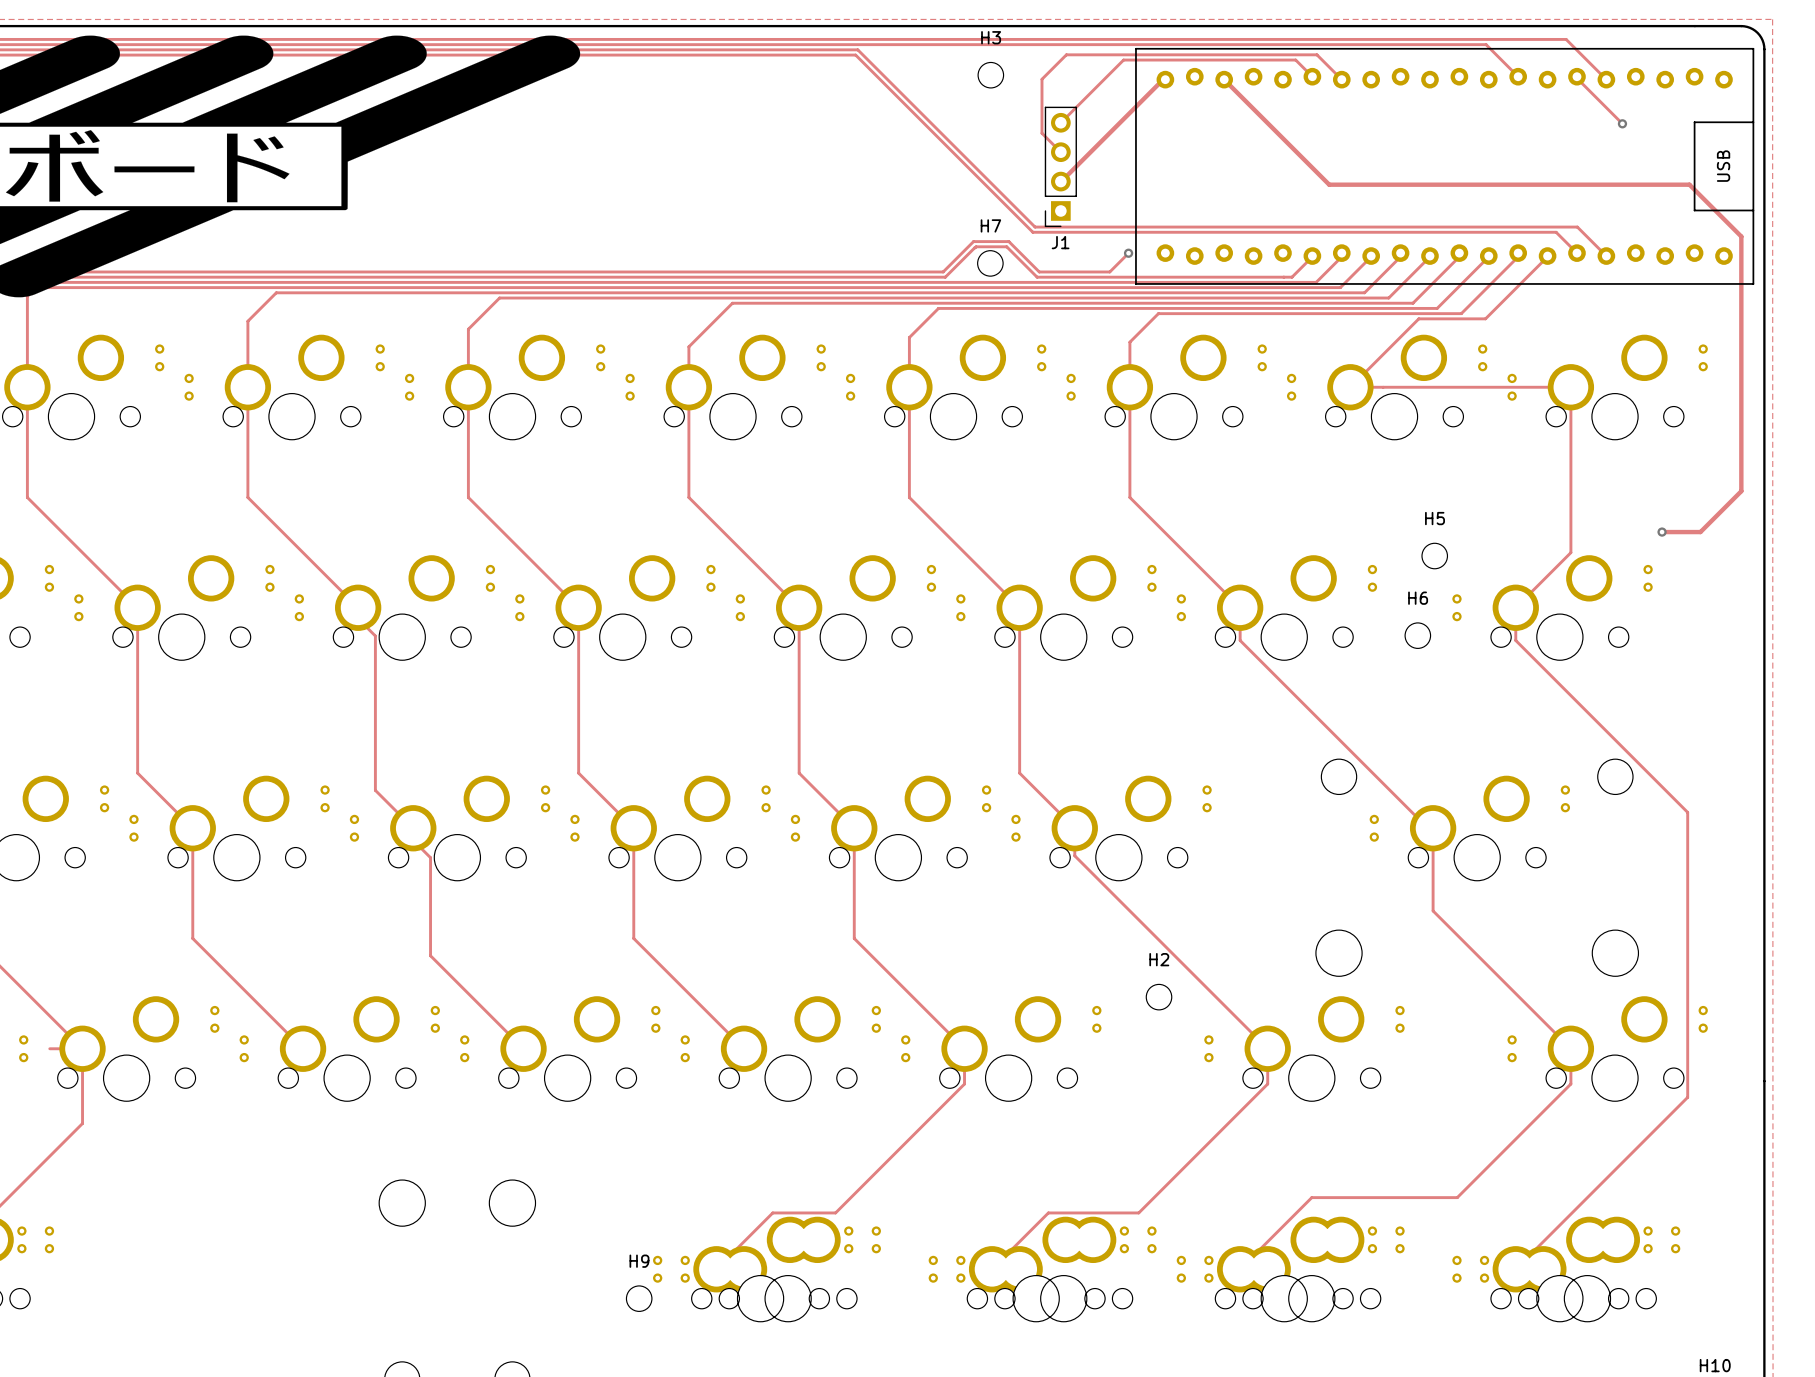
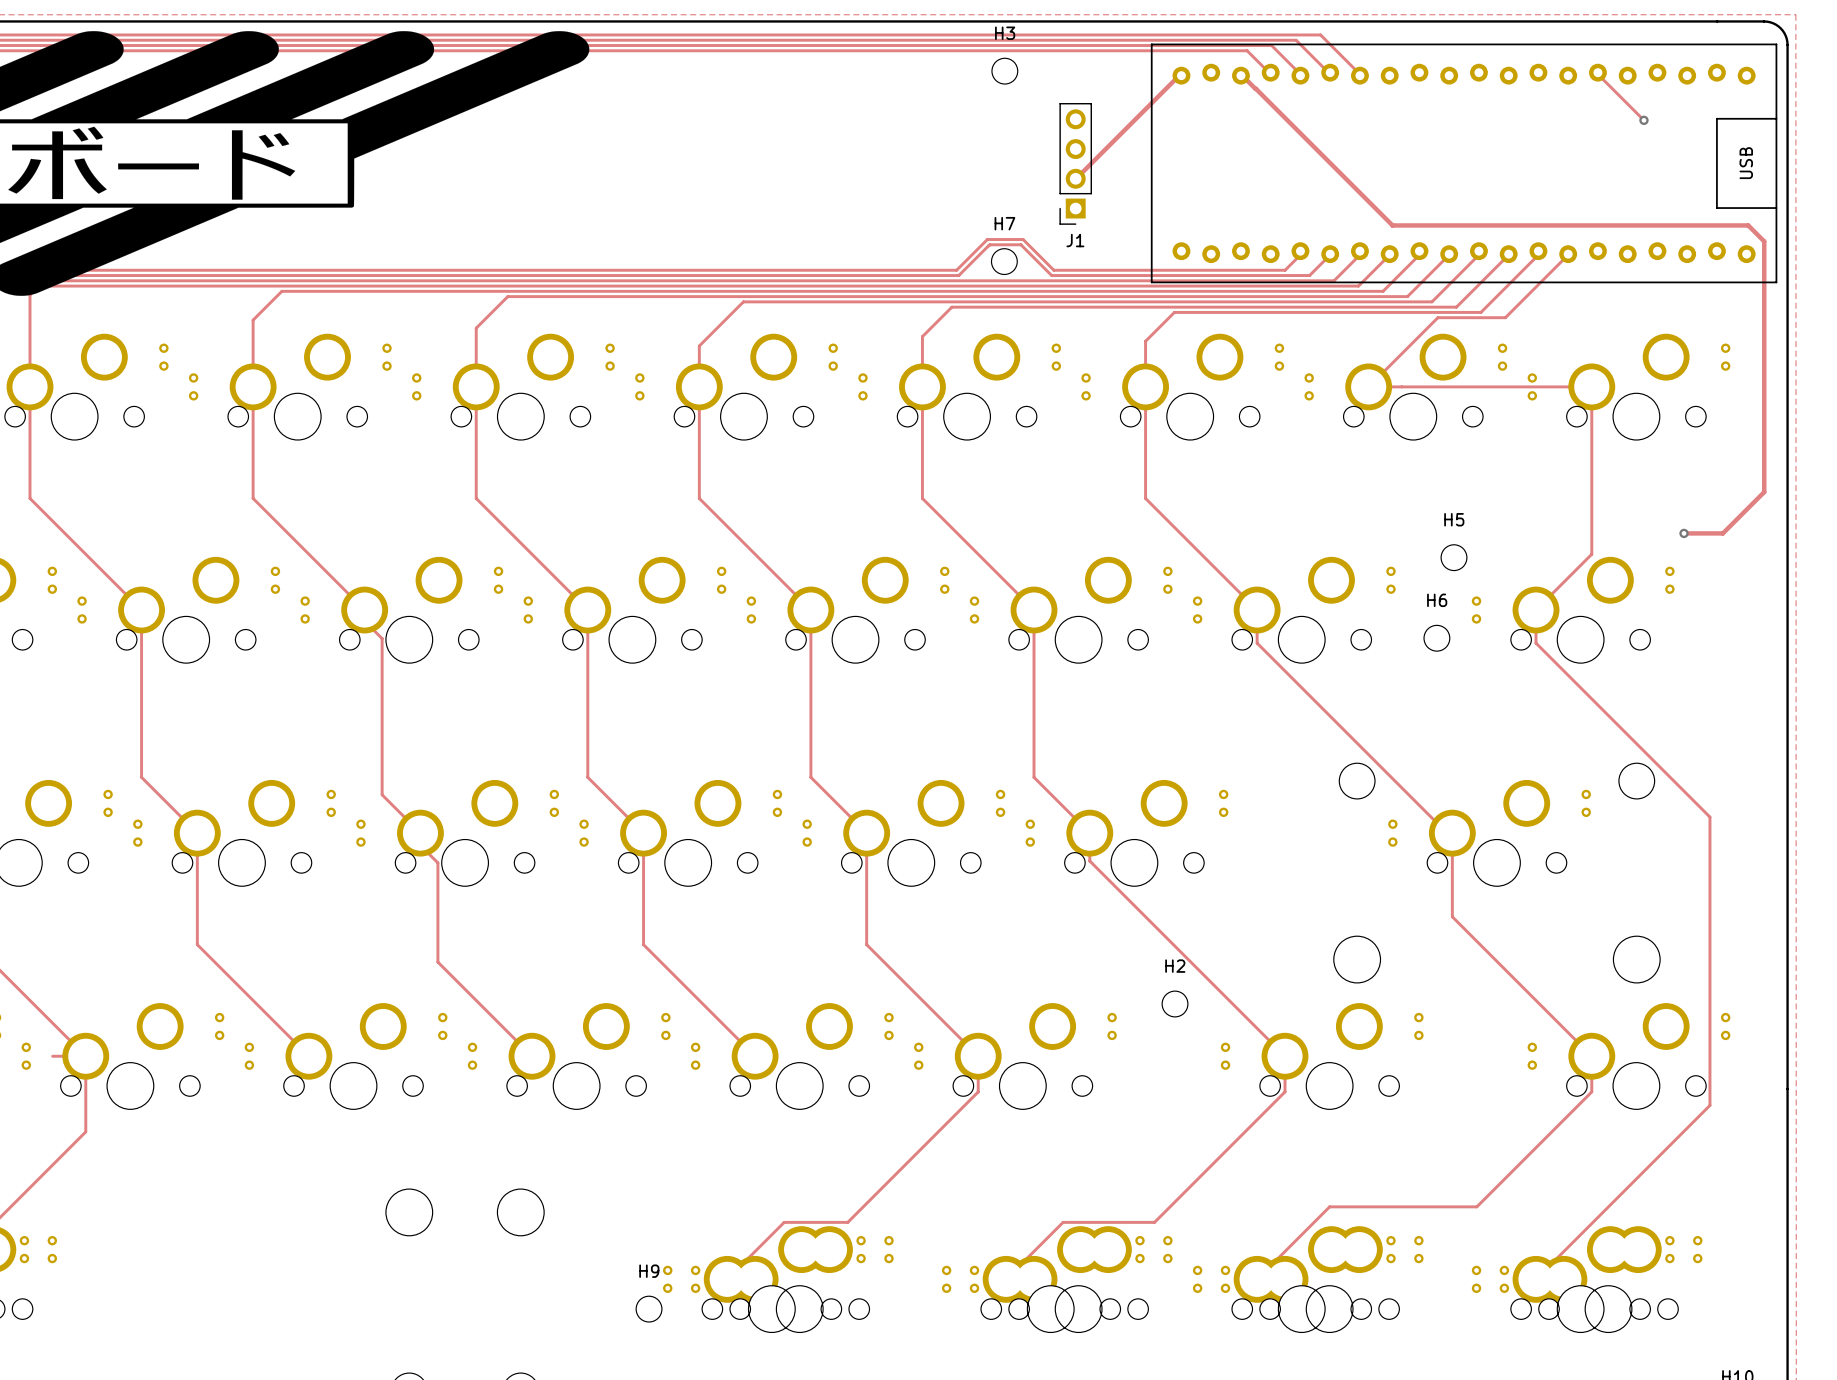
track: (1302, 39) (1566, 39) (1606, 79) -> (1320, 34) (1361, 75)
track: (1278, 44) (1486, 44) (1518, 76) -> (1296, 40) (1331, 75)
track: (857, 49) (1035, 227) (1577, 227) (1606, 256) -> (870, 45) (1271, 45) (1301, 75)
track: (855, 55) (1032, 232) (1556, 232) (1576, 253) -> (868, 50) (1247, 50) (1271, 75)
track: (1312, 76) (1295, 60) (1123, 60) (1060, 122) -> none
track: (1224, 79) (1329, 184) (1689, 184) (1741, 236) (1741, 243) -> (1392, 225) (1748, 225) (1764, 241)
track: none -> (1242, 75) (1392, 225)
track: (1341, 79) (1316, 54) (1066, 54) (1041, 79) (1041, 133) (1060, 152) -> none
track: (1128, 253) (1109, 271) -> (1301, 253) (1285, 270) (1125, 270)
via: (1128, 253) -> none

